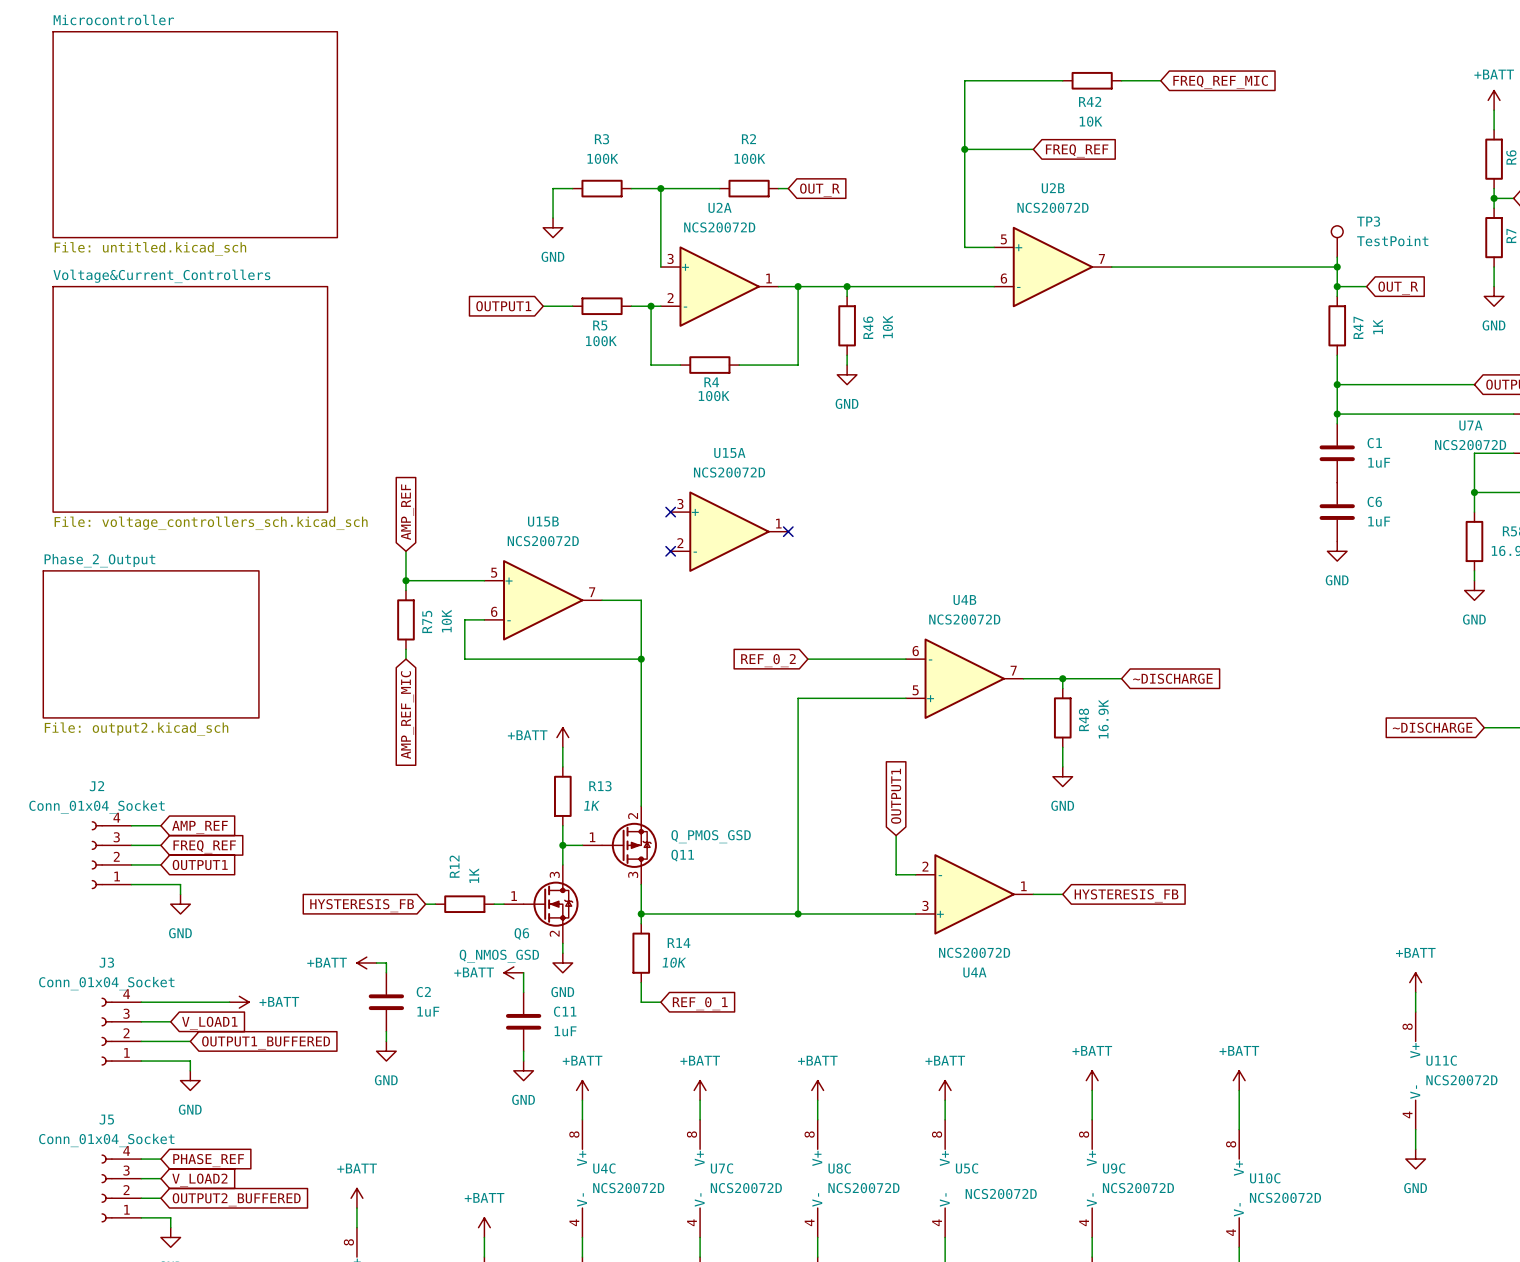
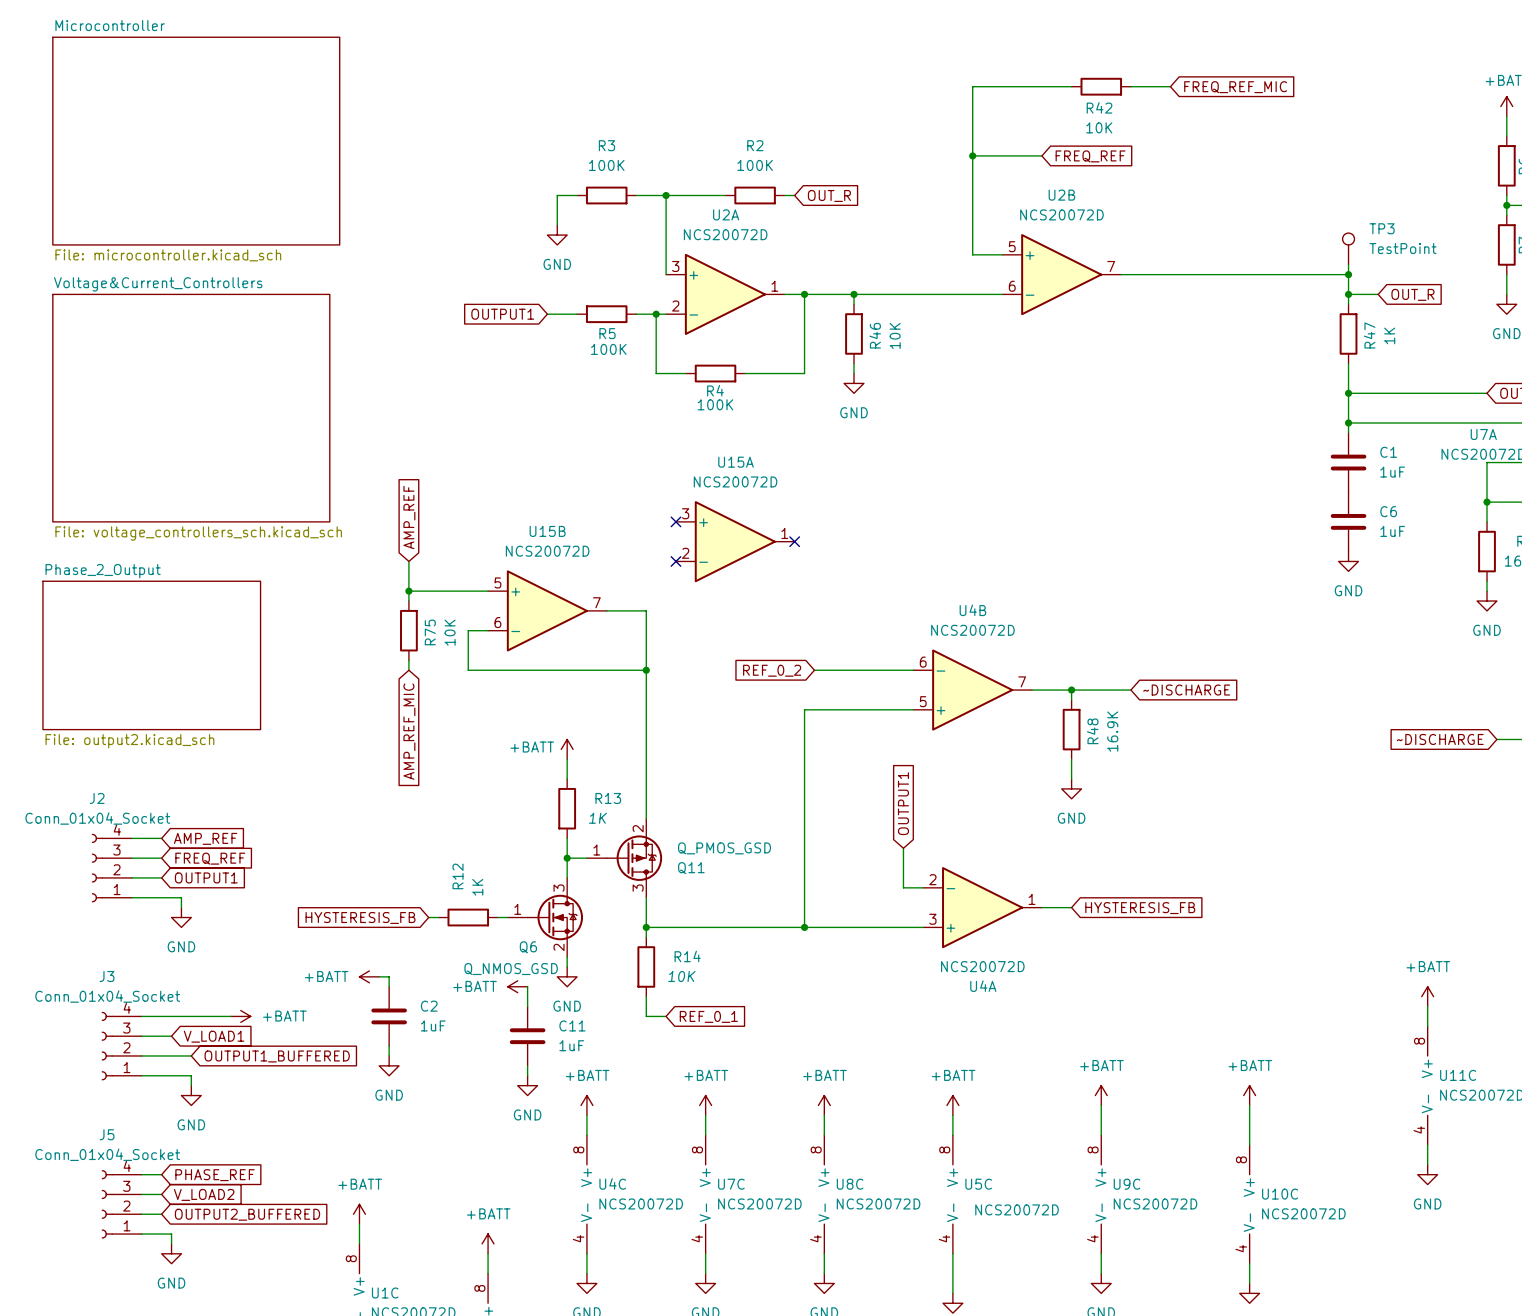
sheet Microcontroller value: File: untitled.kicad_sch (150, 248) -> File: microcontroller.kicad_sch (168, 255)

